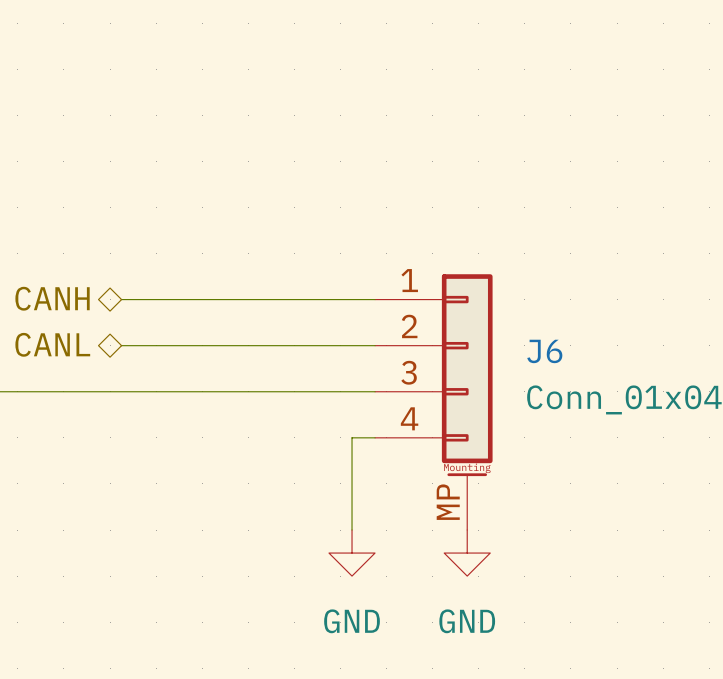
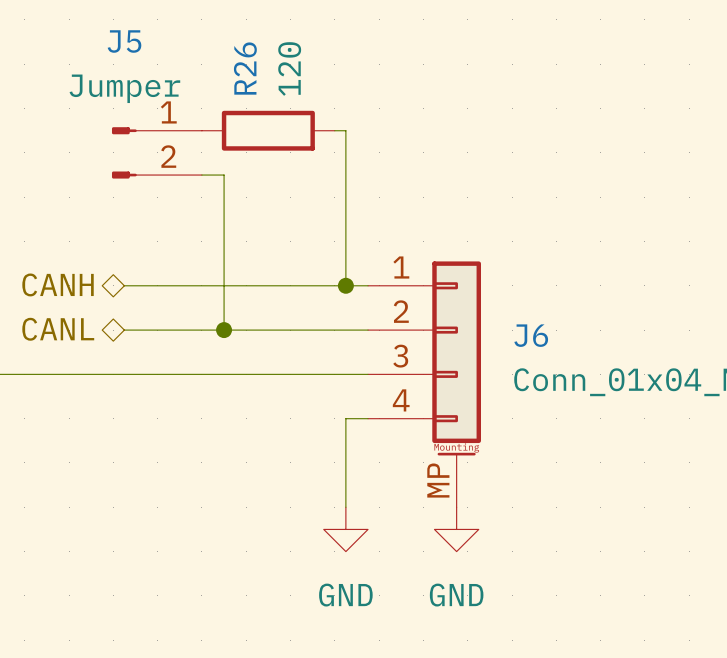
R26: none -> 120 (268, 130)
wire: none -> (334, 130) (345, 130) (345, 285)
J5: none -> Jumper (156, 152)
wire: none -> (201, 175) (224, 175) (224, 330)
junction: none -> (345, 285)
junction: none -> (224, 330)

